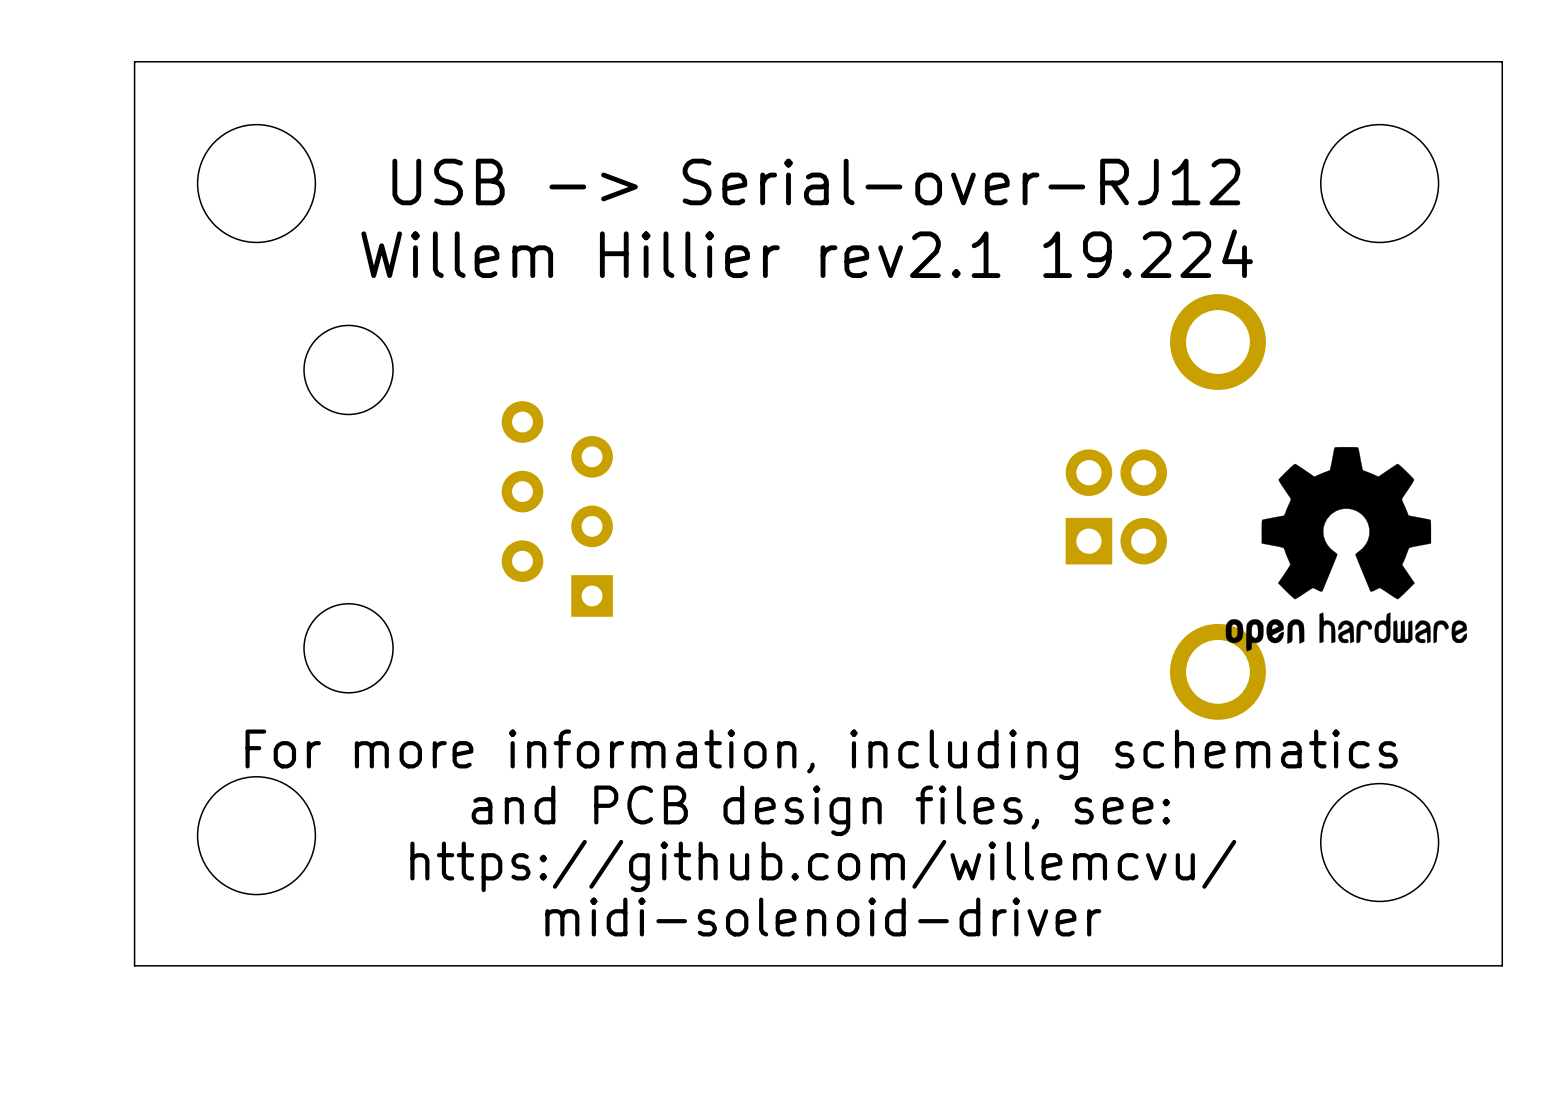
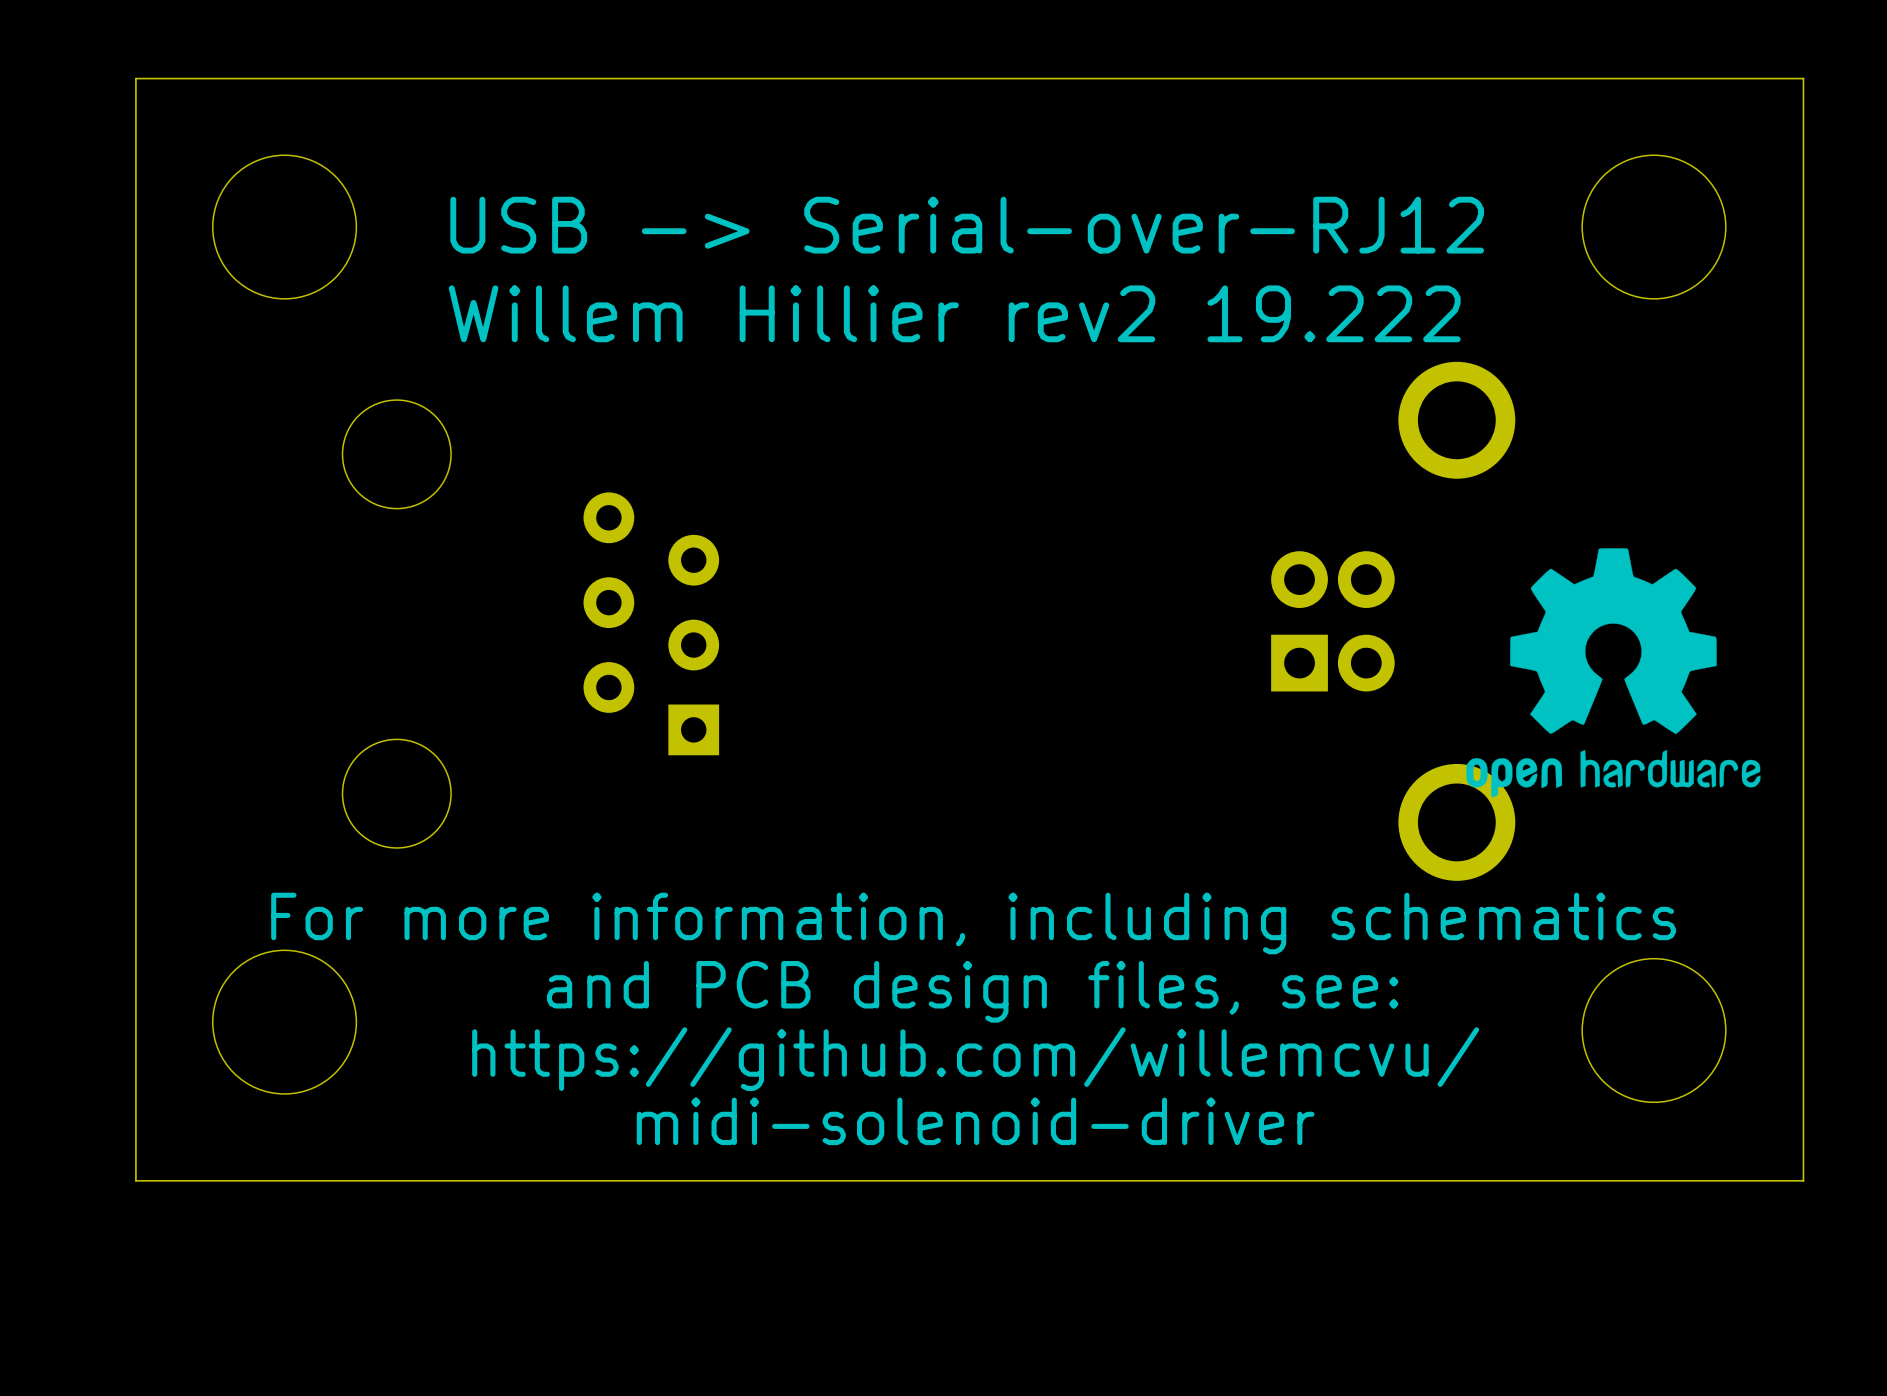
text: Willem Hillier rev2.1 19.224 (807, 253) -> Willem Hillier rev2 19.222 (954, 313)

